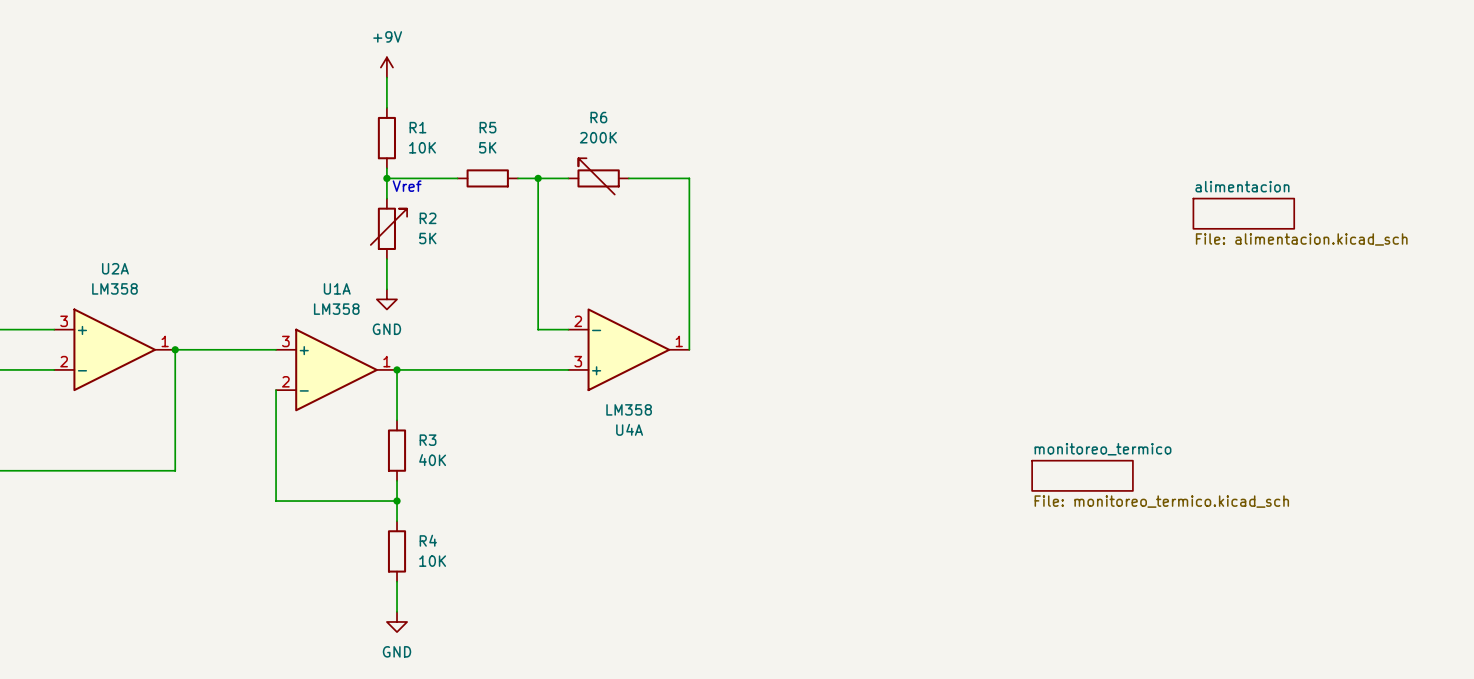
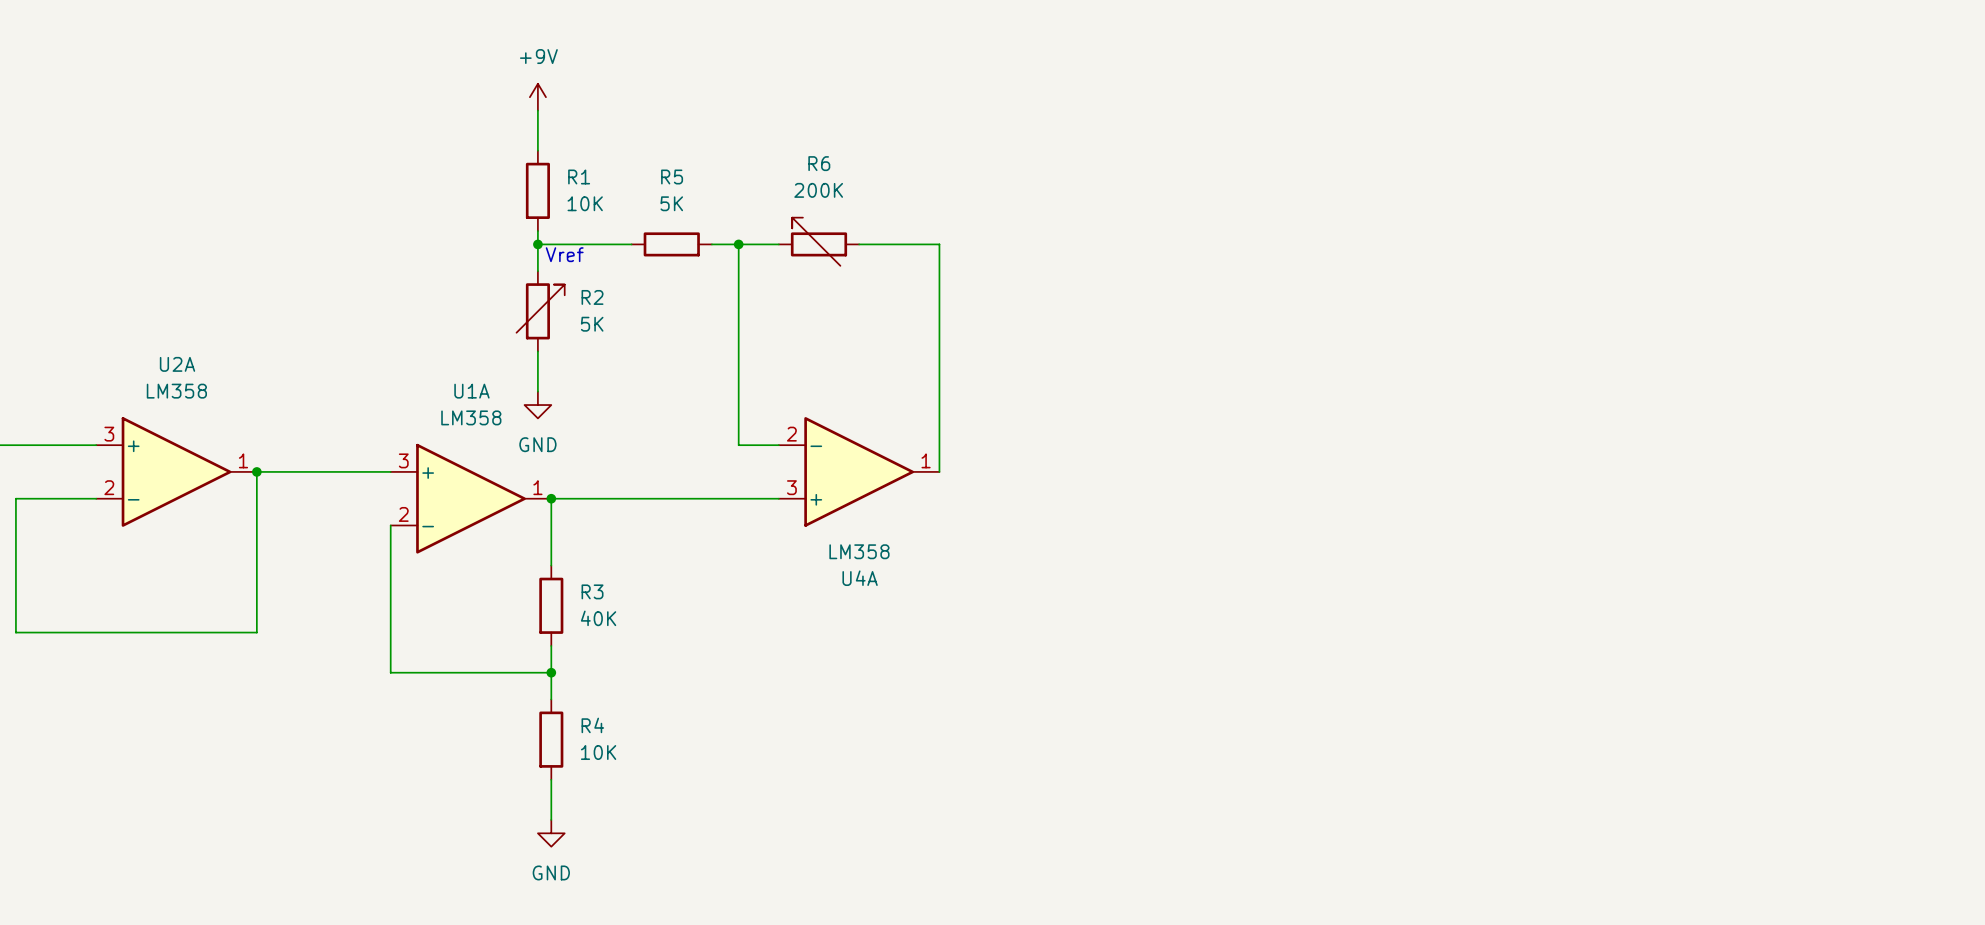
sheet alimentacion: File: alimentacion.kicad_sch (1243, 213) -> none
sheet monitoreo_termico: File: monitoreo_termico.kicad_sch (1082, 475) -> none

